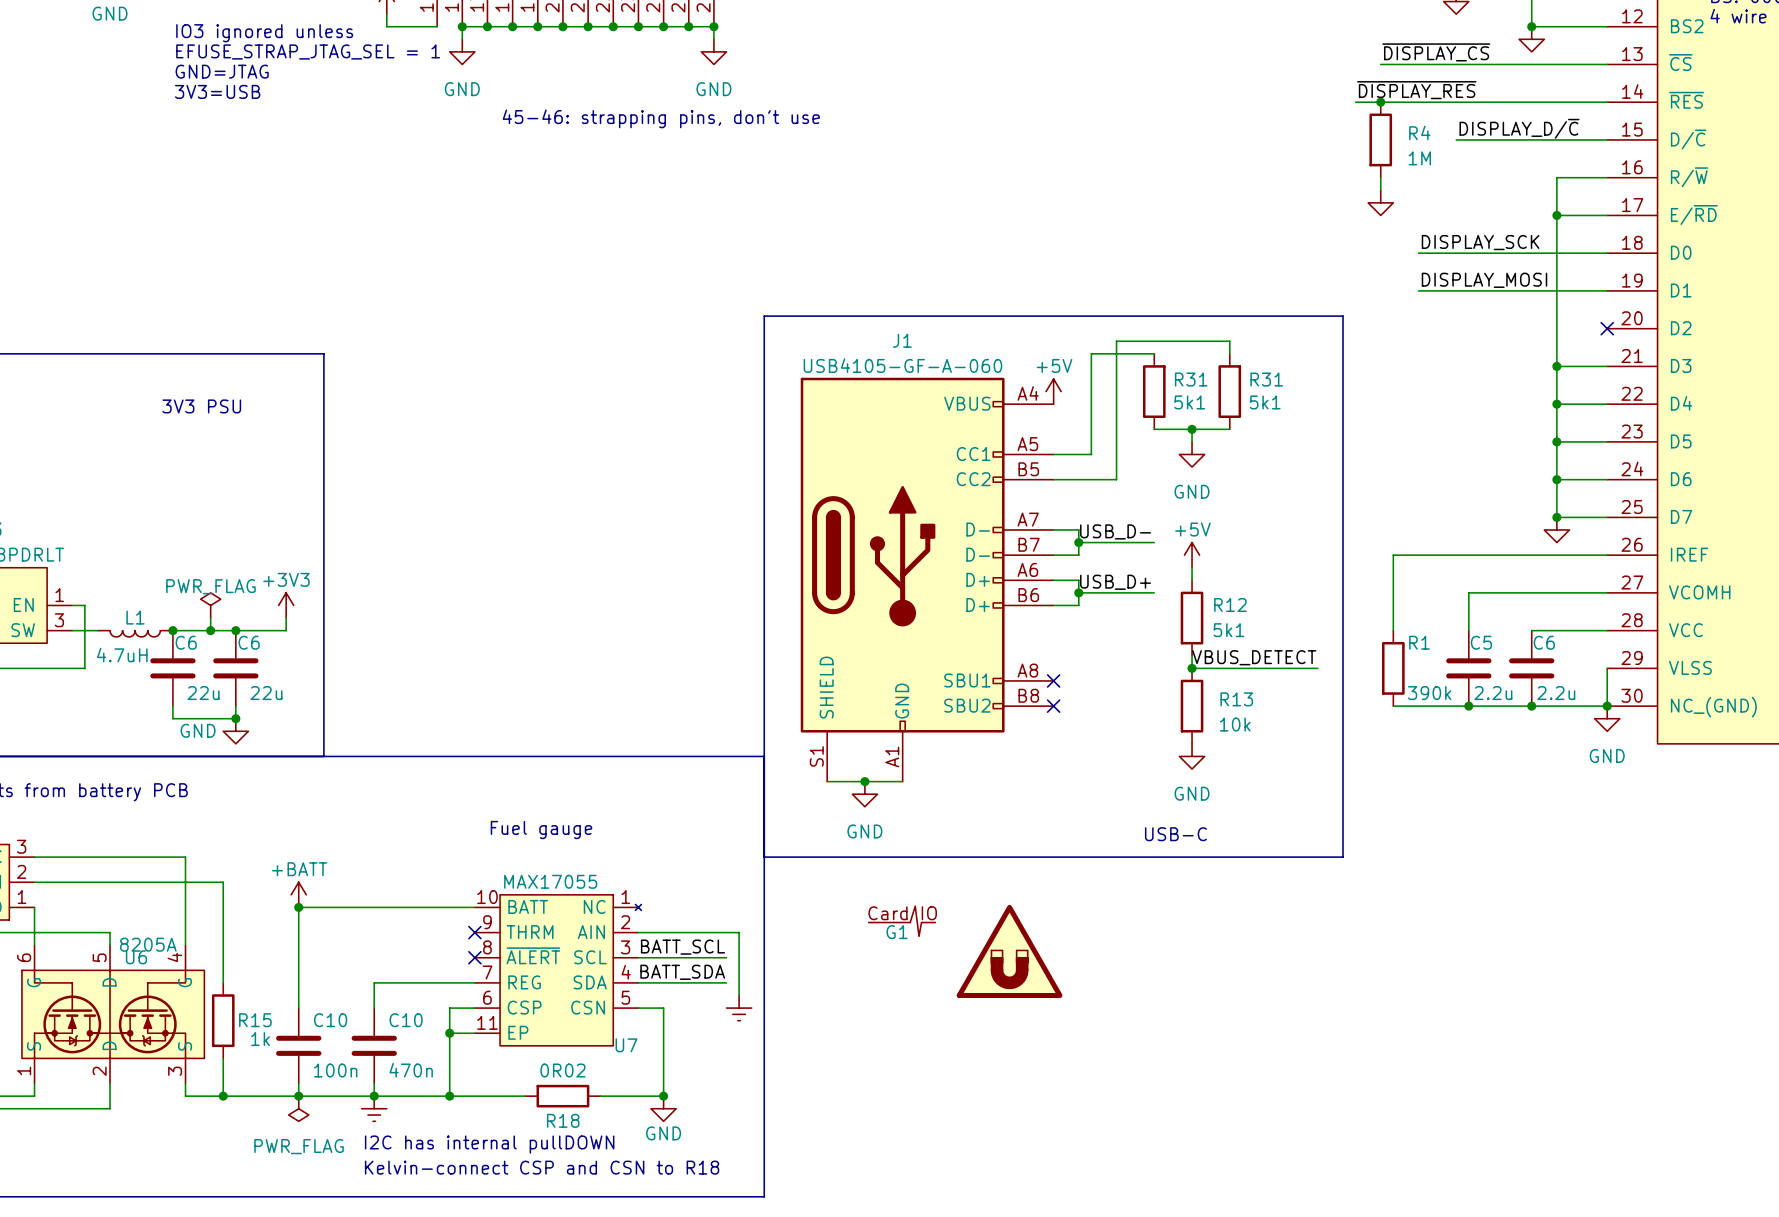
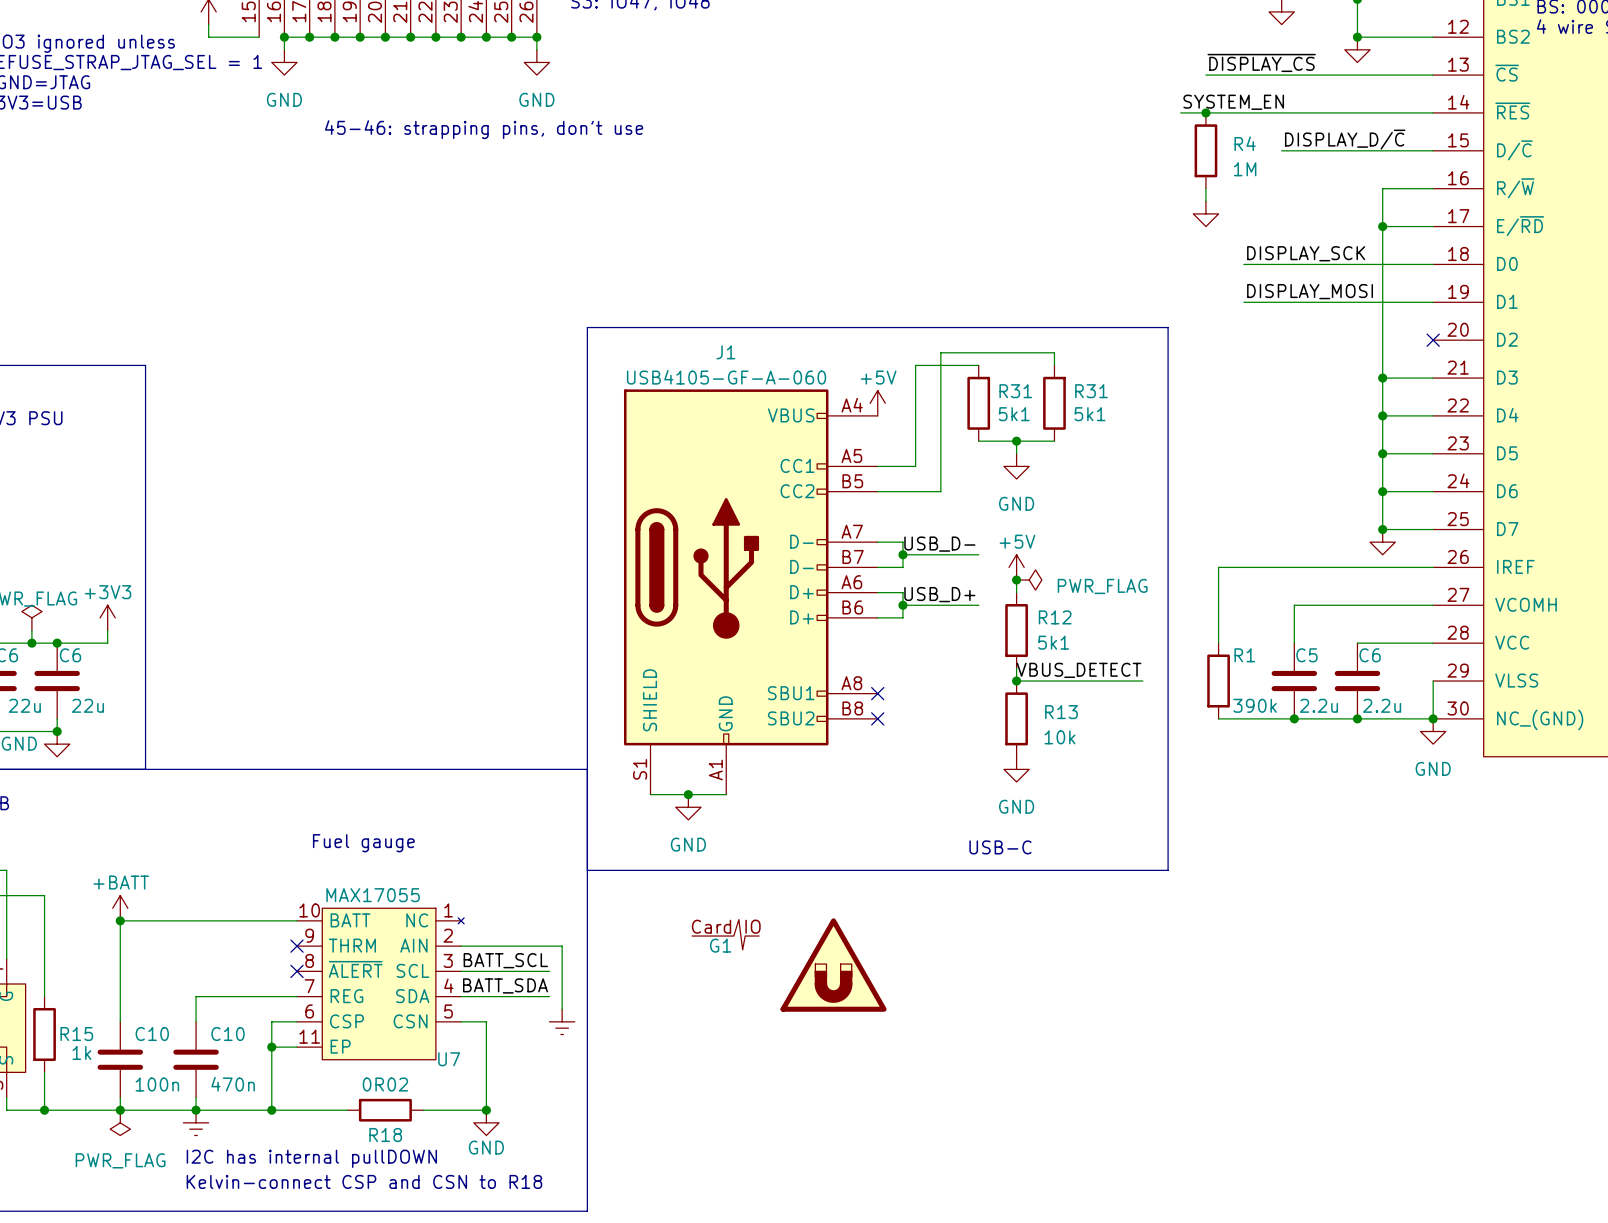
label: ~{DISPLAY_RES} (1416, 90) -> SYSTEM_EN (1233, 102)
junction: none -> (1016, 580)
power symbol: none -> PWR_FLAG (1029, 580)

